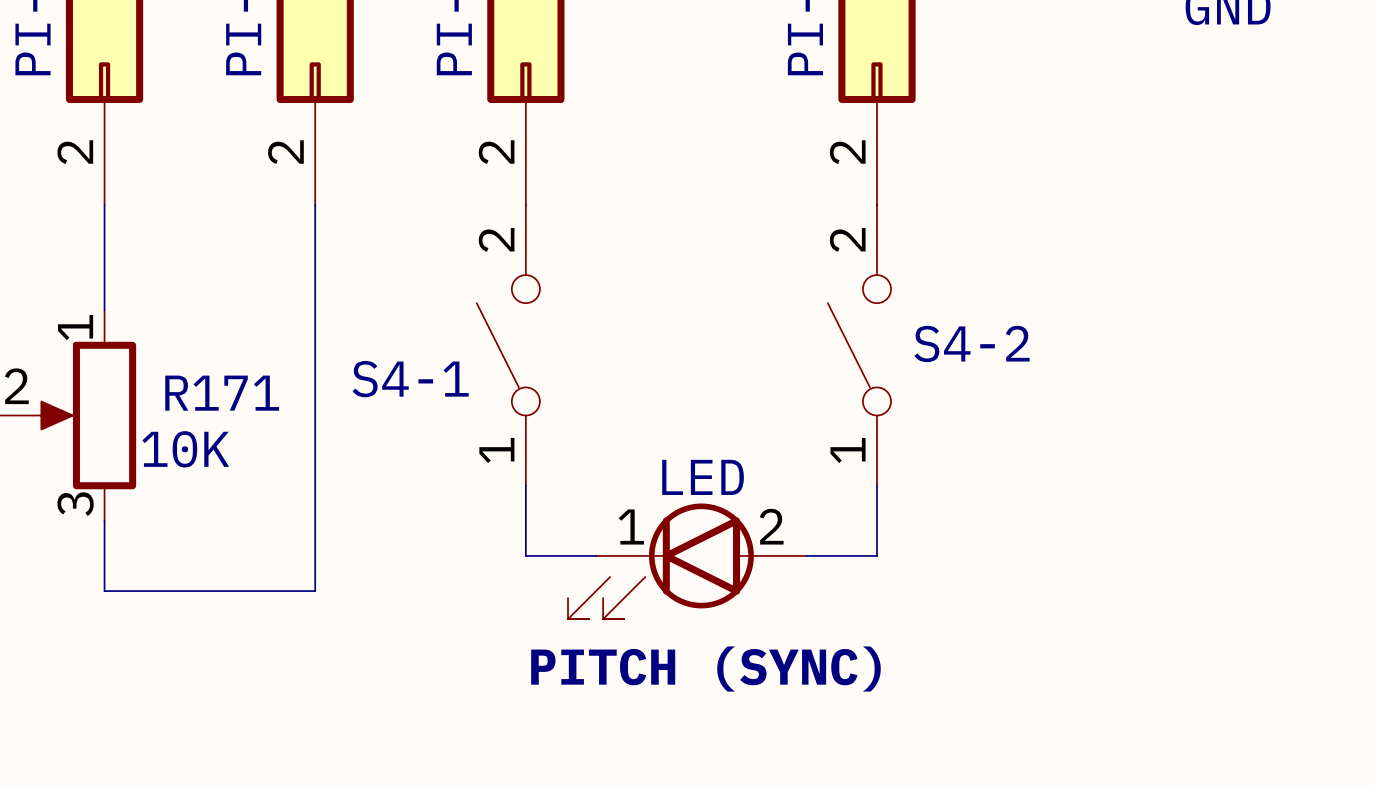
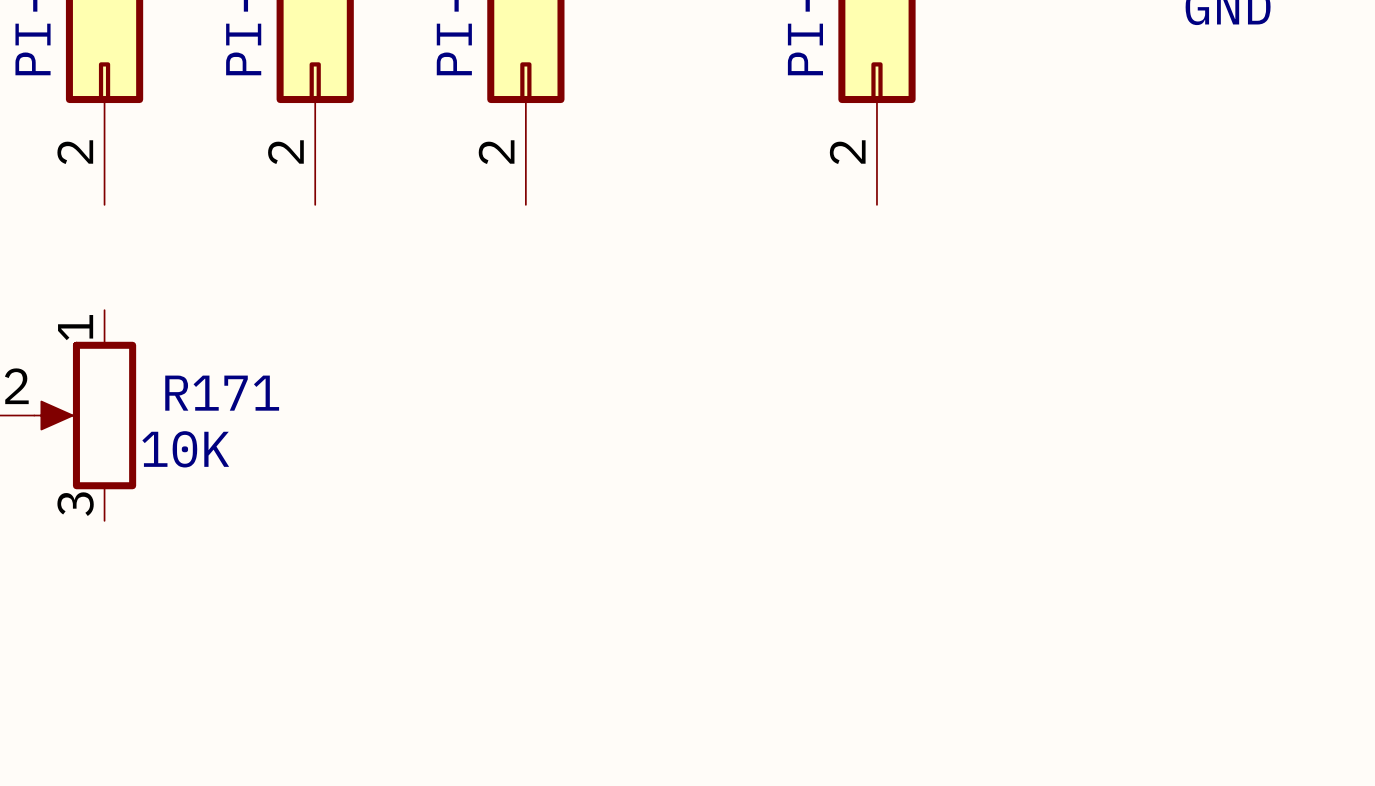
wire: (104, 204) (104, 310) -> none
wire: (315, 204) (315, 591) (104, 591) (104, 520) -> none
S4-1: (508, 345) -> none
S4-2: (859, 345) -> none
wire: (525, 485) (525, 555) (596, 555) -> none
wire: (876, 485) (876, 555) (806, 555) -> none
LED: (687, 561) -> none
text: PITCH (SYNC) (705, 669) -> none

